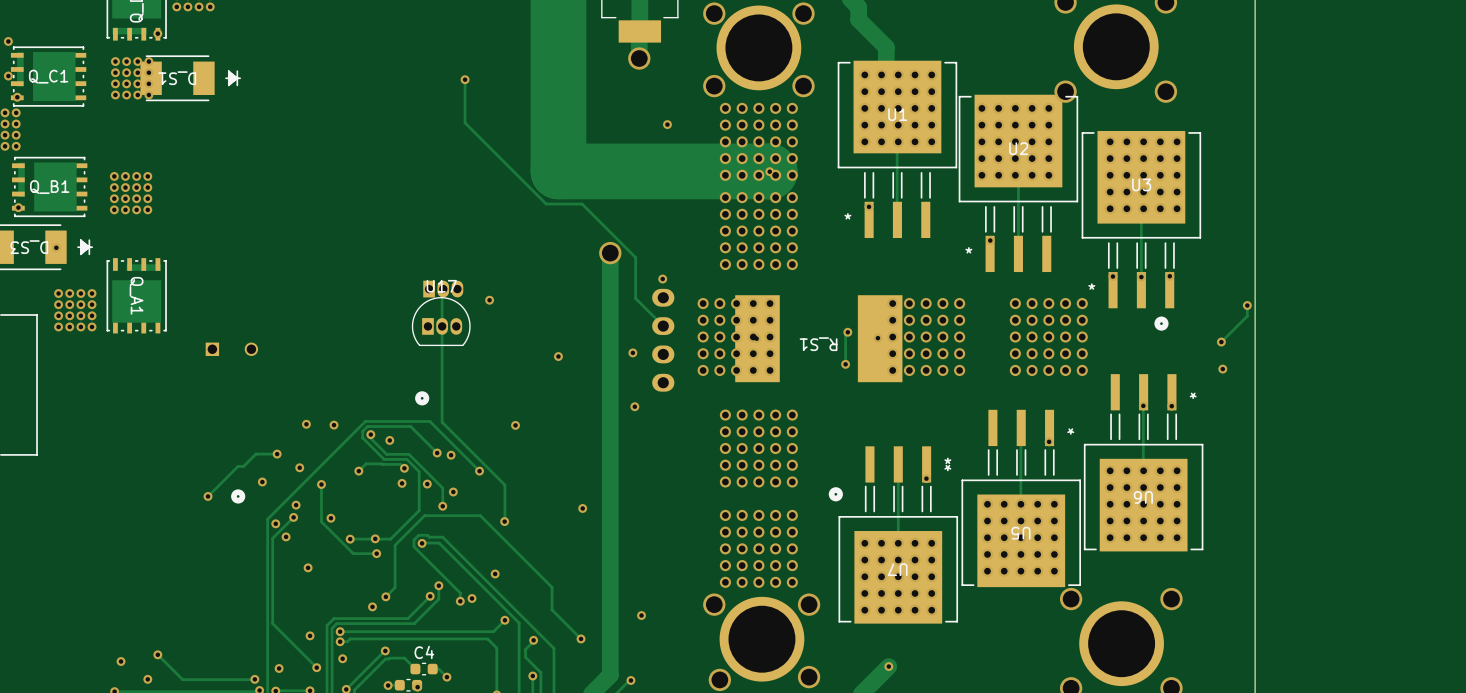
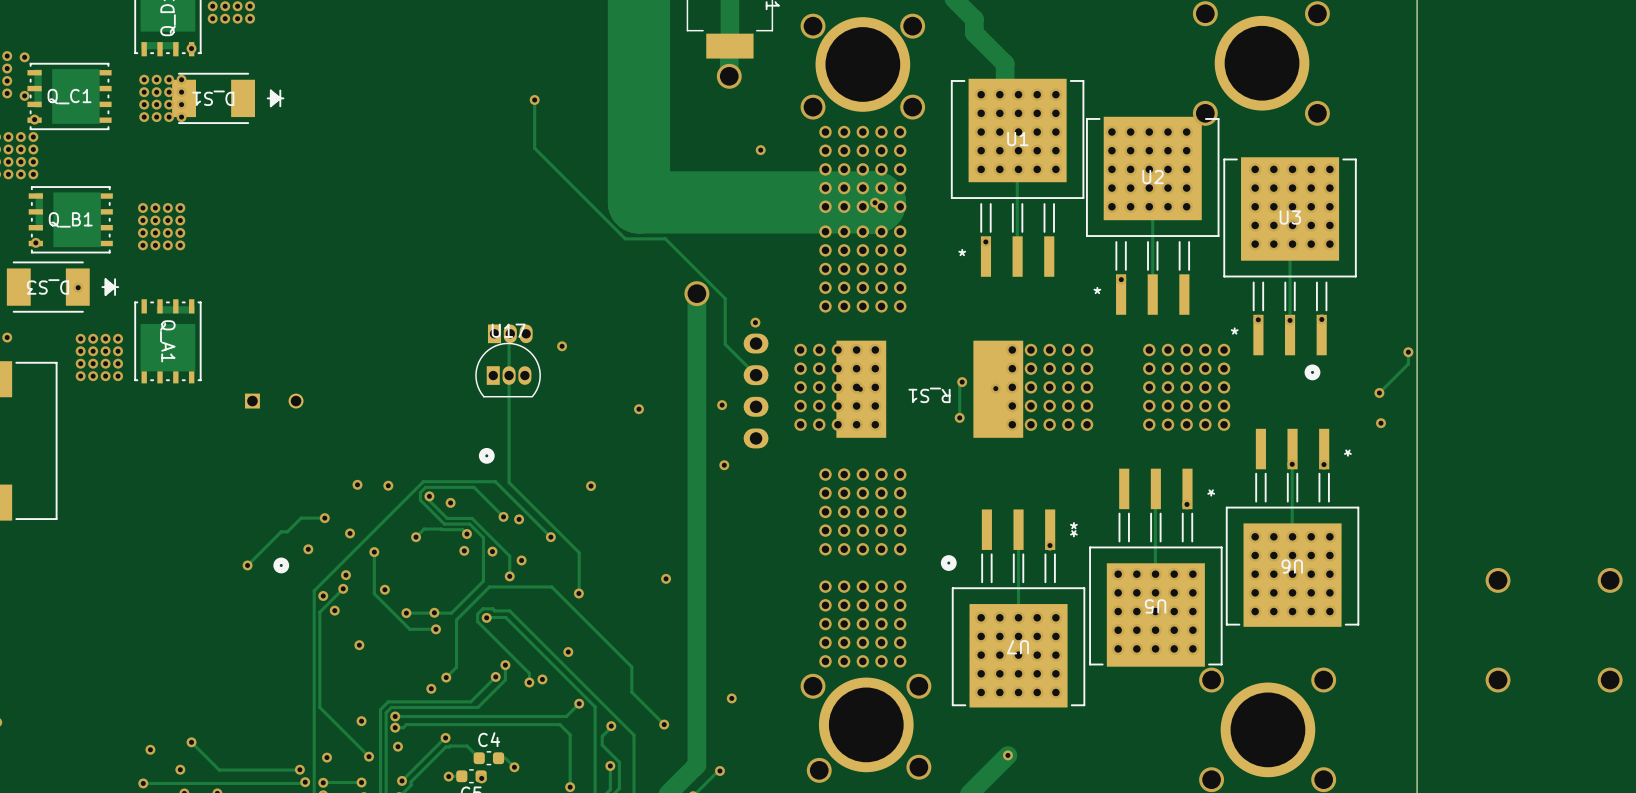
via: none -> (1498, 580)
via: none -> (1610, 580)
via: none -> (1498, 680)
via: none -> (1610, 680)

